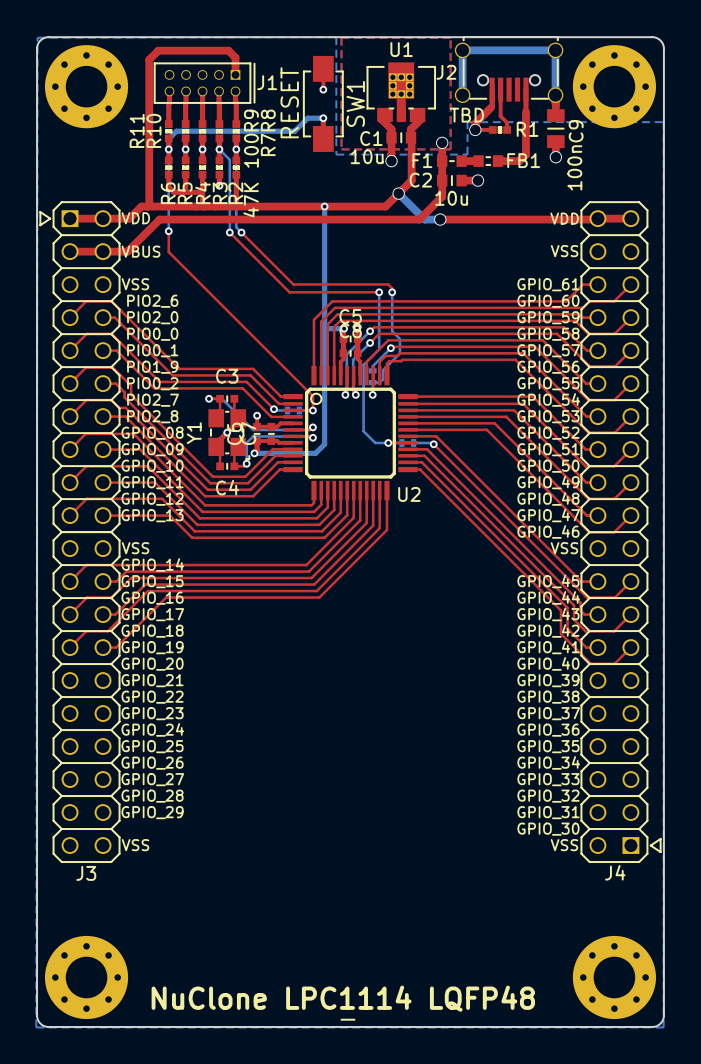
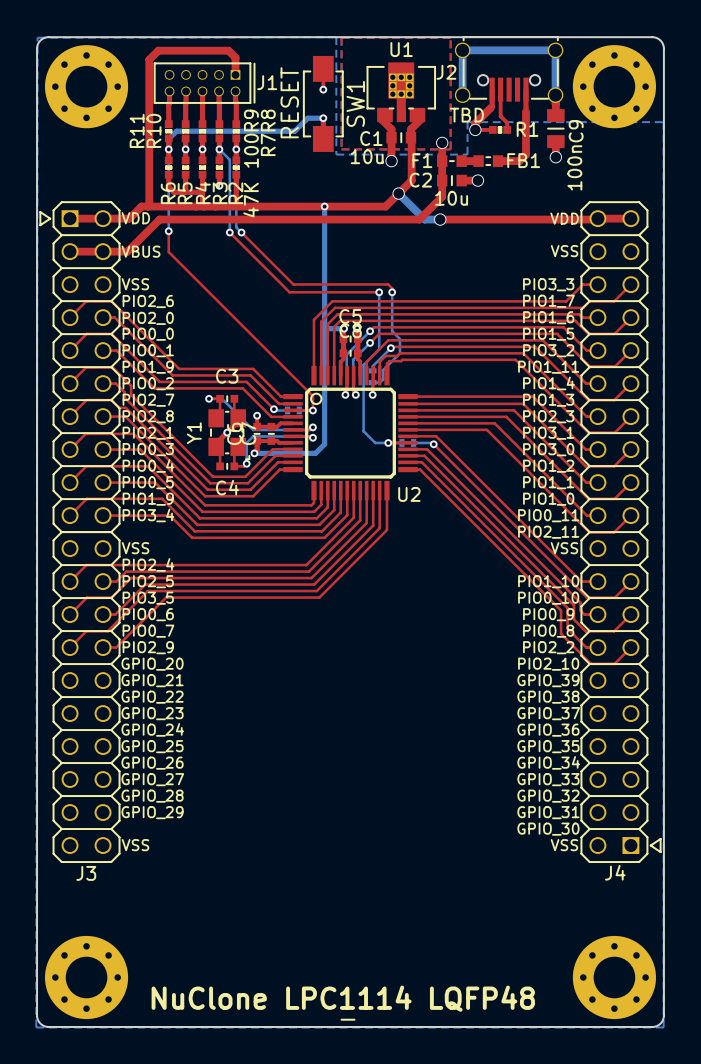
J3 footprint: [39, 201, 121, 863] -> [39, 201, 121, 863]
J4 footprint: [580, 201, 662, 863] -> [580, 201, 662, 863]

